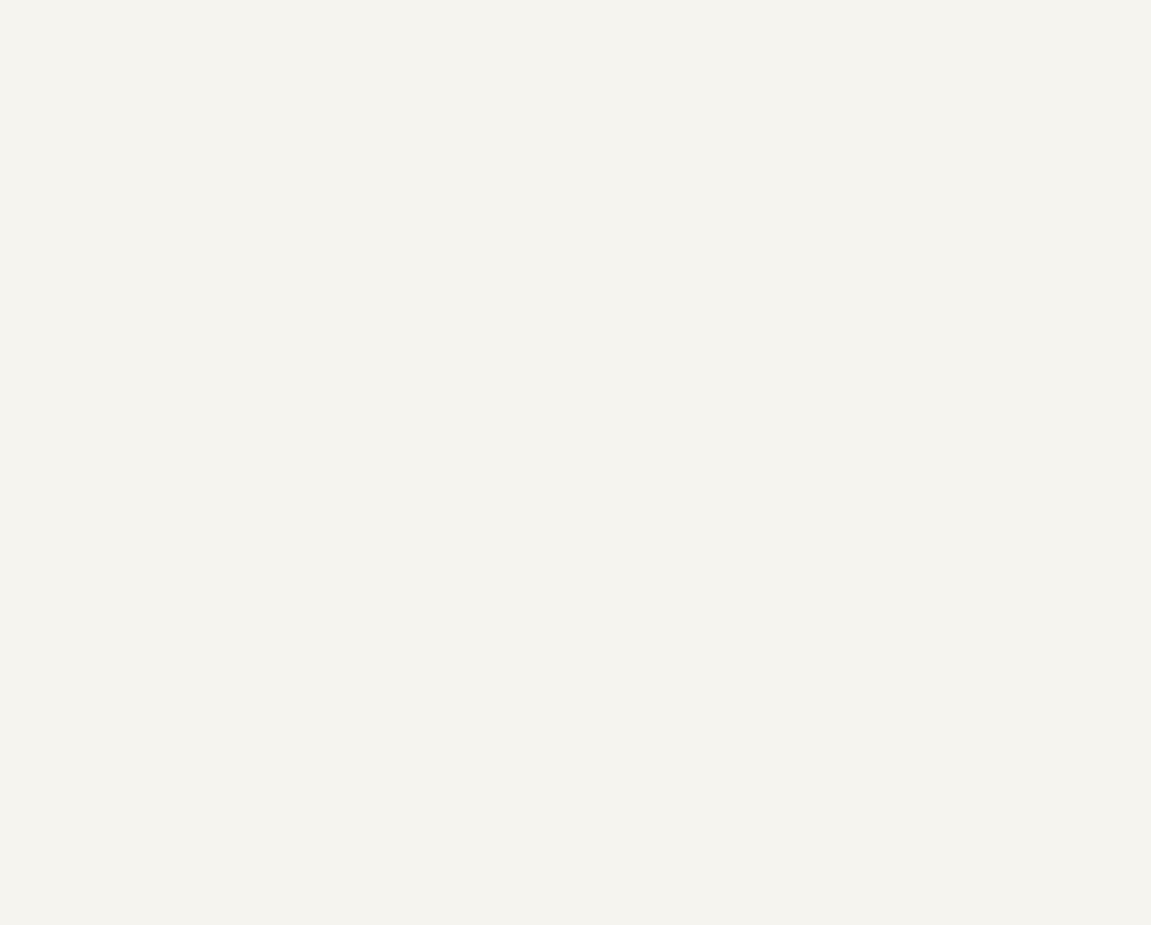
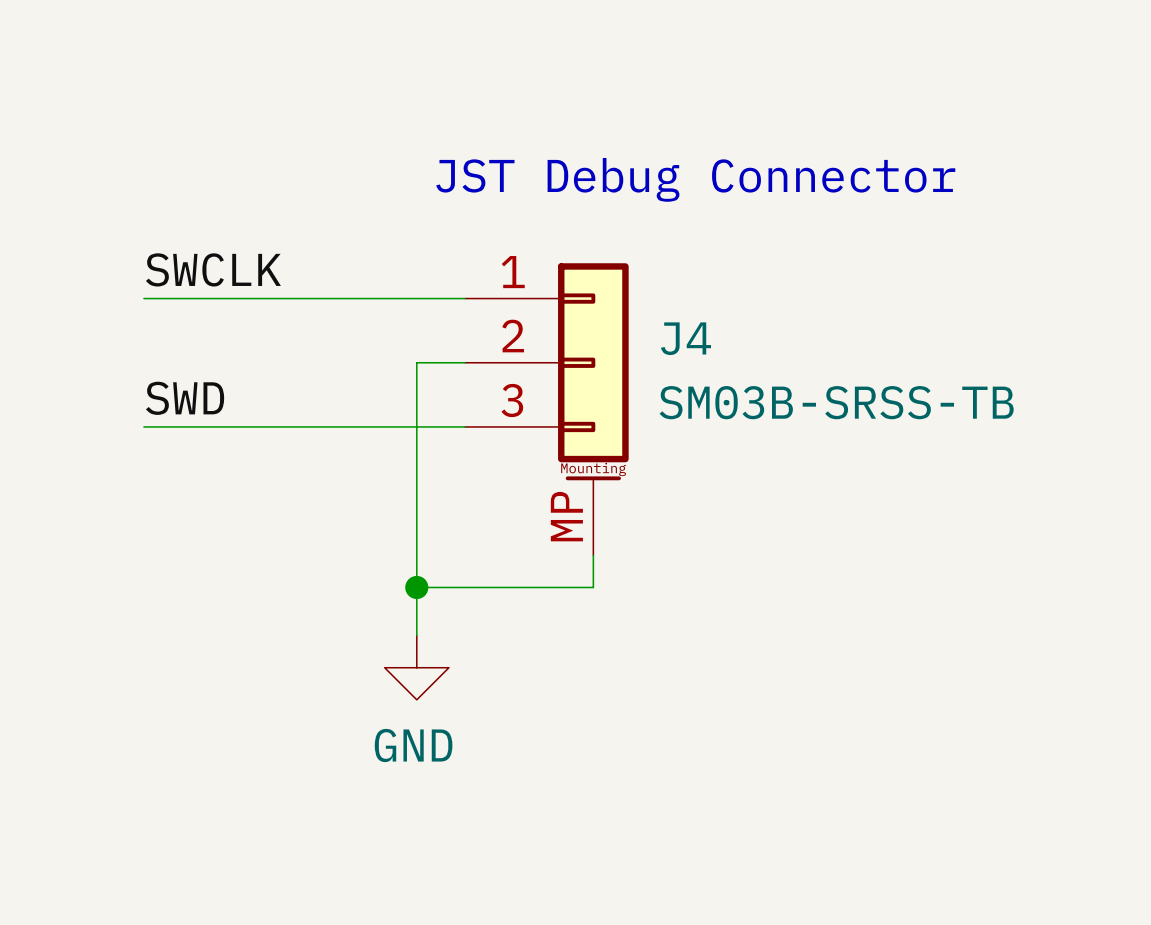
text: none -> JST Debug Connector (695, 179)
label: none -> SWCLK (213, 269)
wire: none -> (143, 298) (464, 298)
wire: none -> (464, 362) (416, 362) (416, 635)
label: none -> SWD (185, 398)
J4: none -> SM03B-SRSS-TB (546, 409)
wire: none -> (143, 426) (464, 426)
wire: none -> (593, 555) (593, 587) (416, 587)
junction: none -> (416, 587)
power symbol: none -> GND (416, 667)

